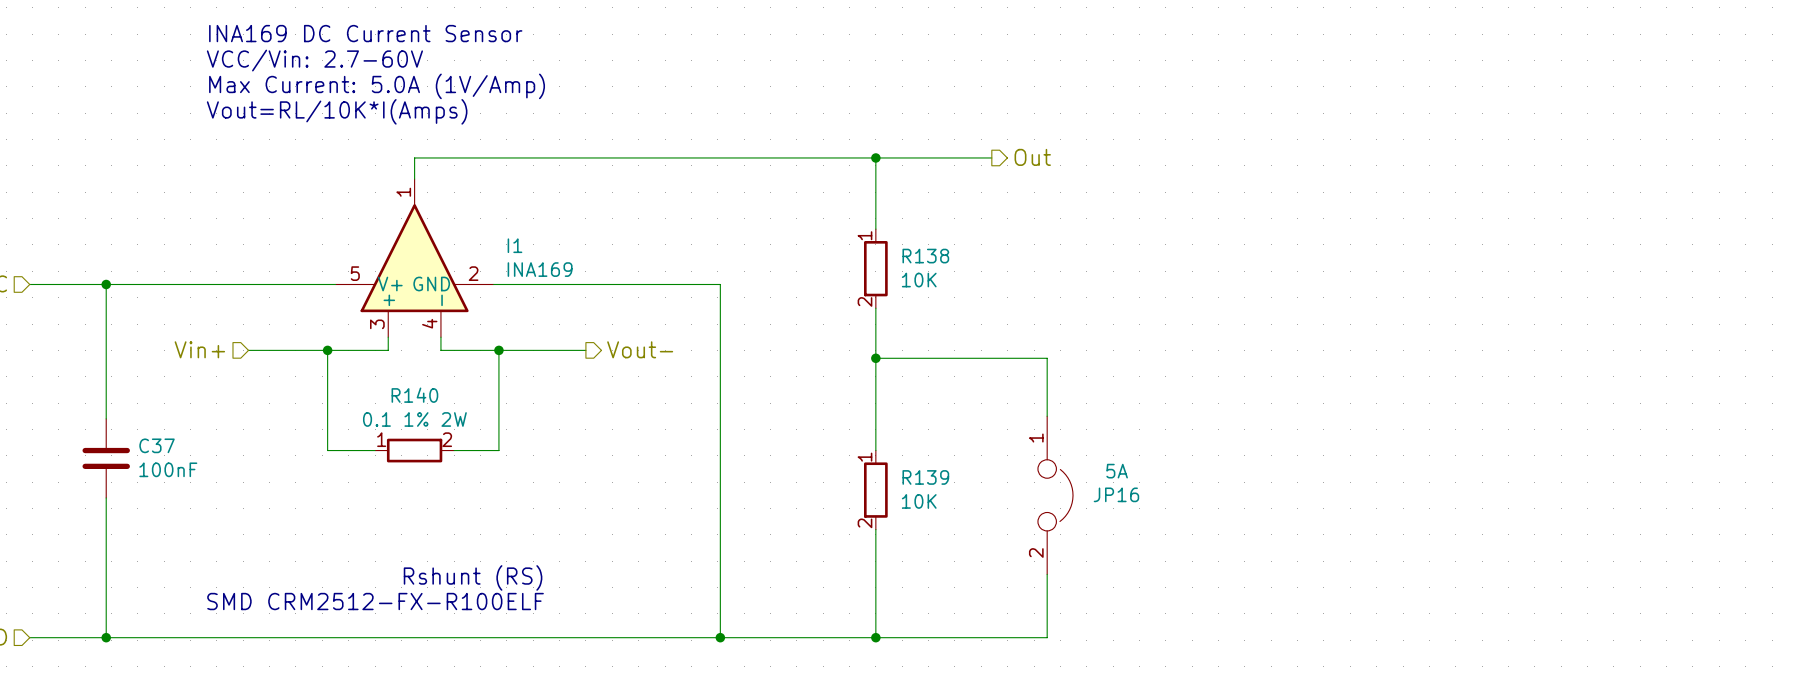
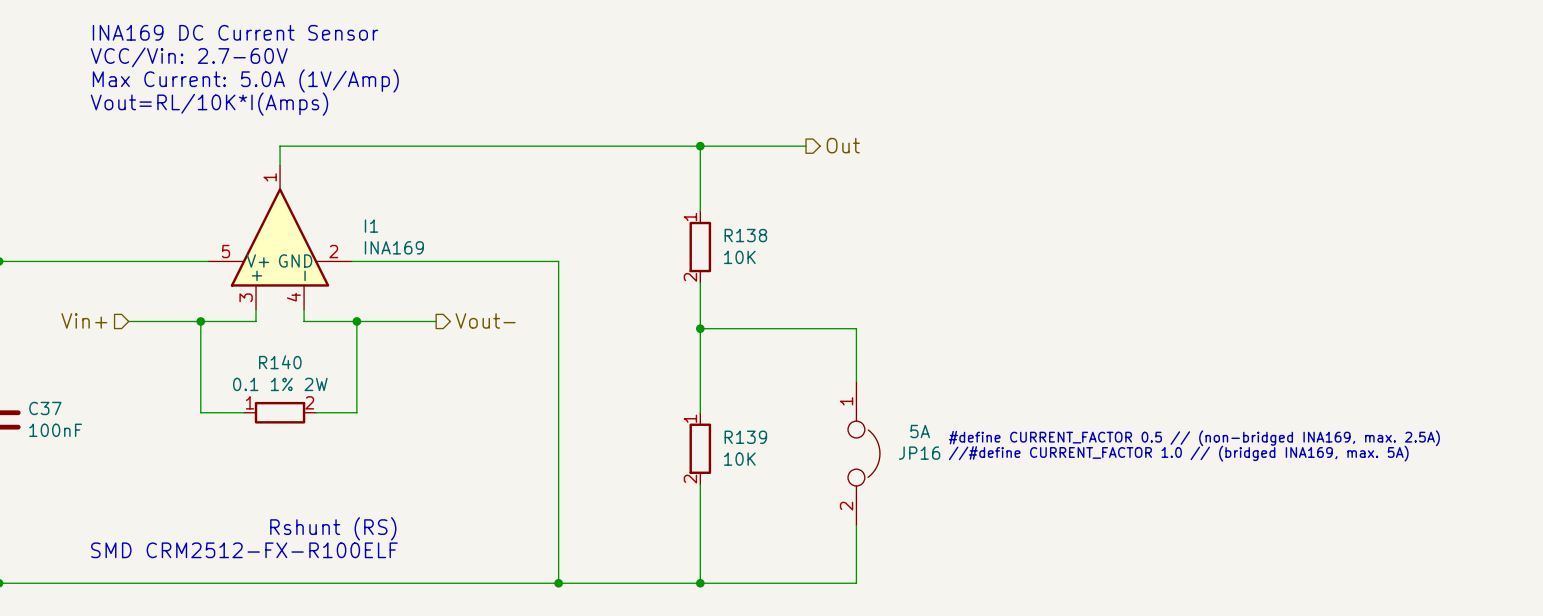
text: none -> #define CURRENT_FACTOR 0.5 // (non-bridged INA169, max. 2.5A) (1194, 438)
text: none -> //#define CURRENT_FACTOR 1.0 // (bridged INA169, max. 5A) (1178, 453)

